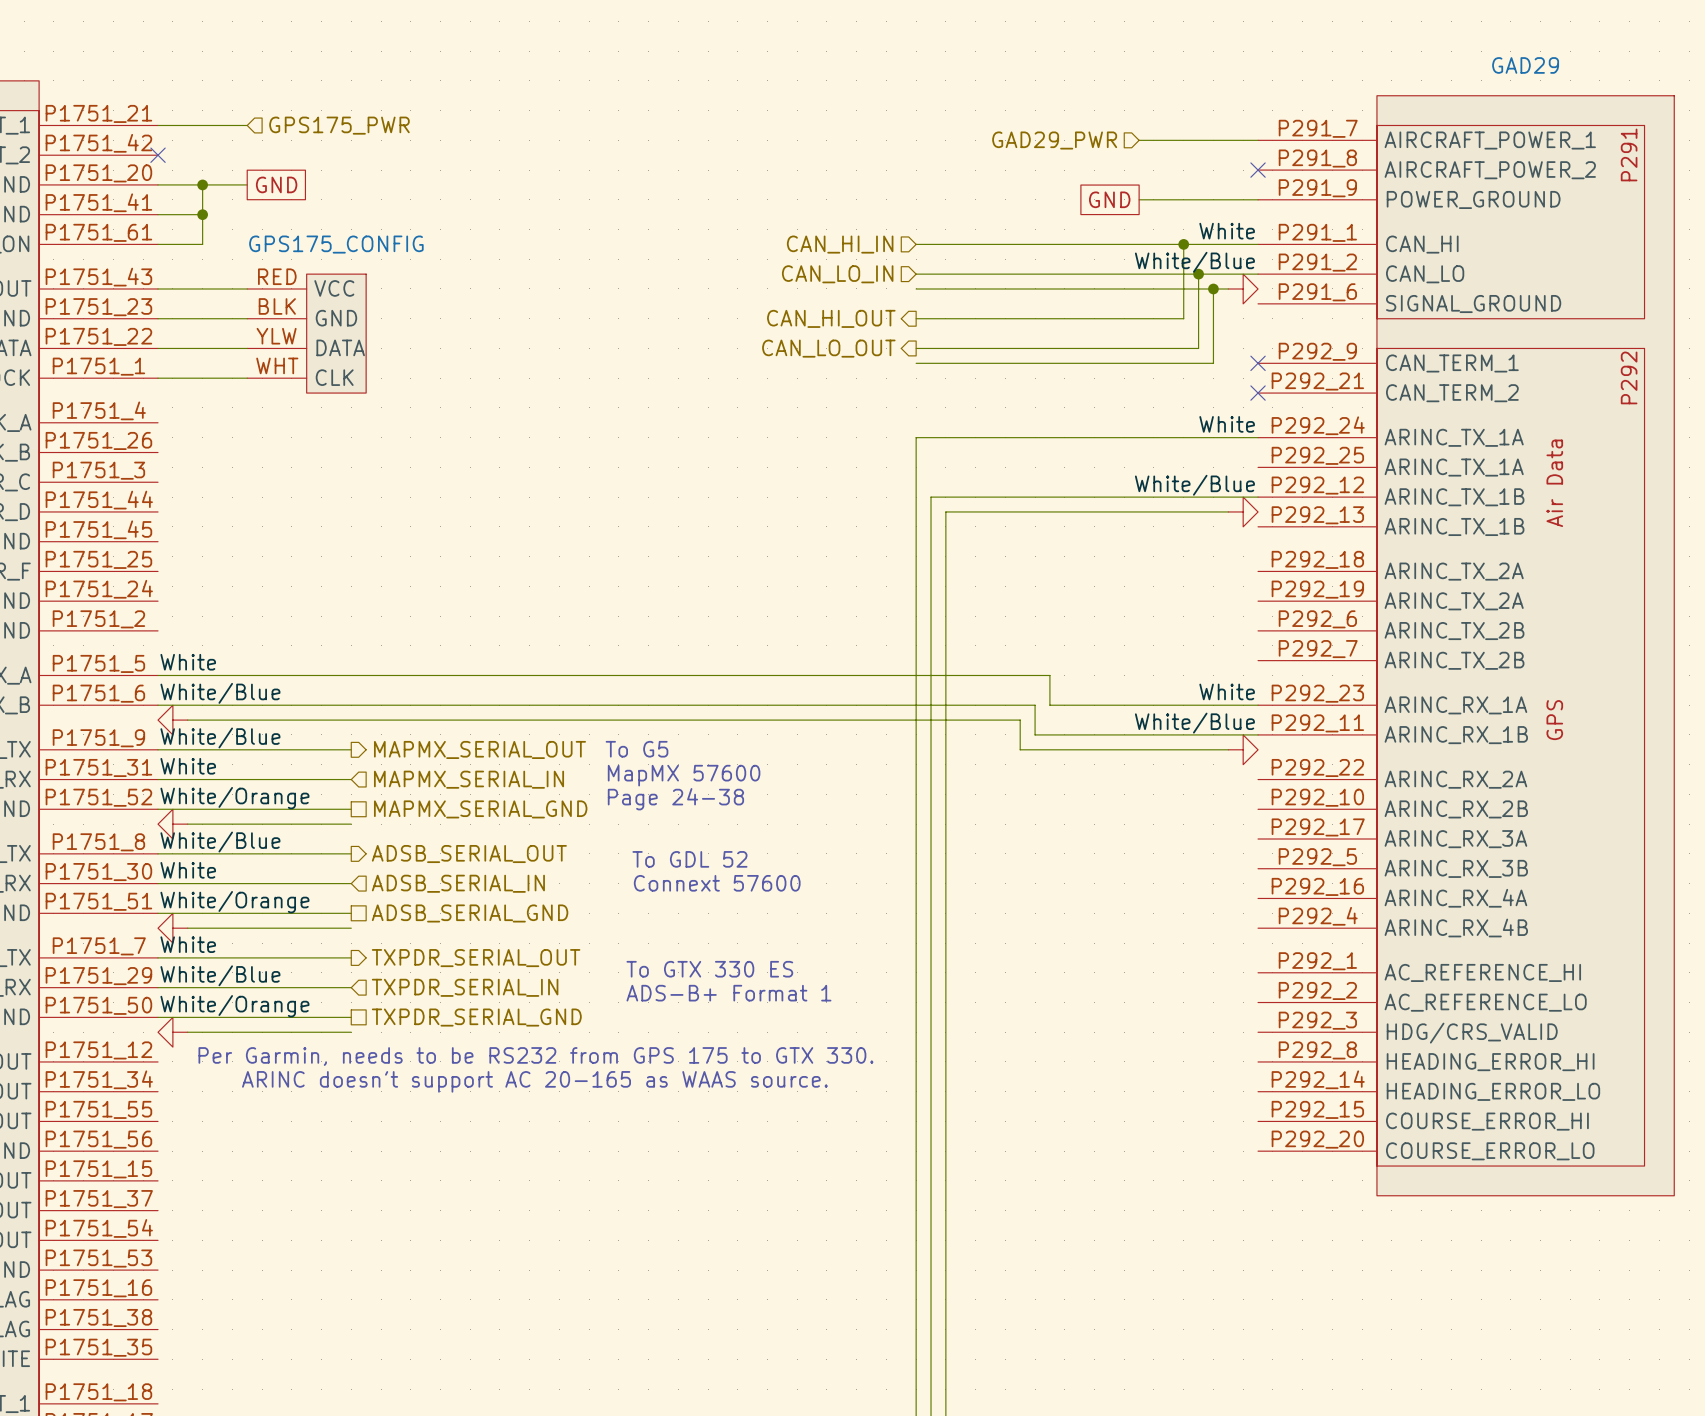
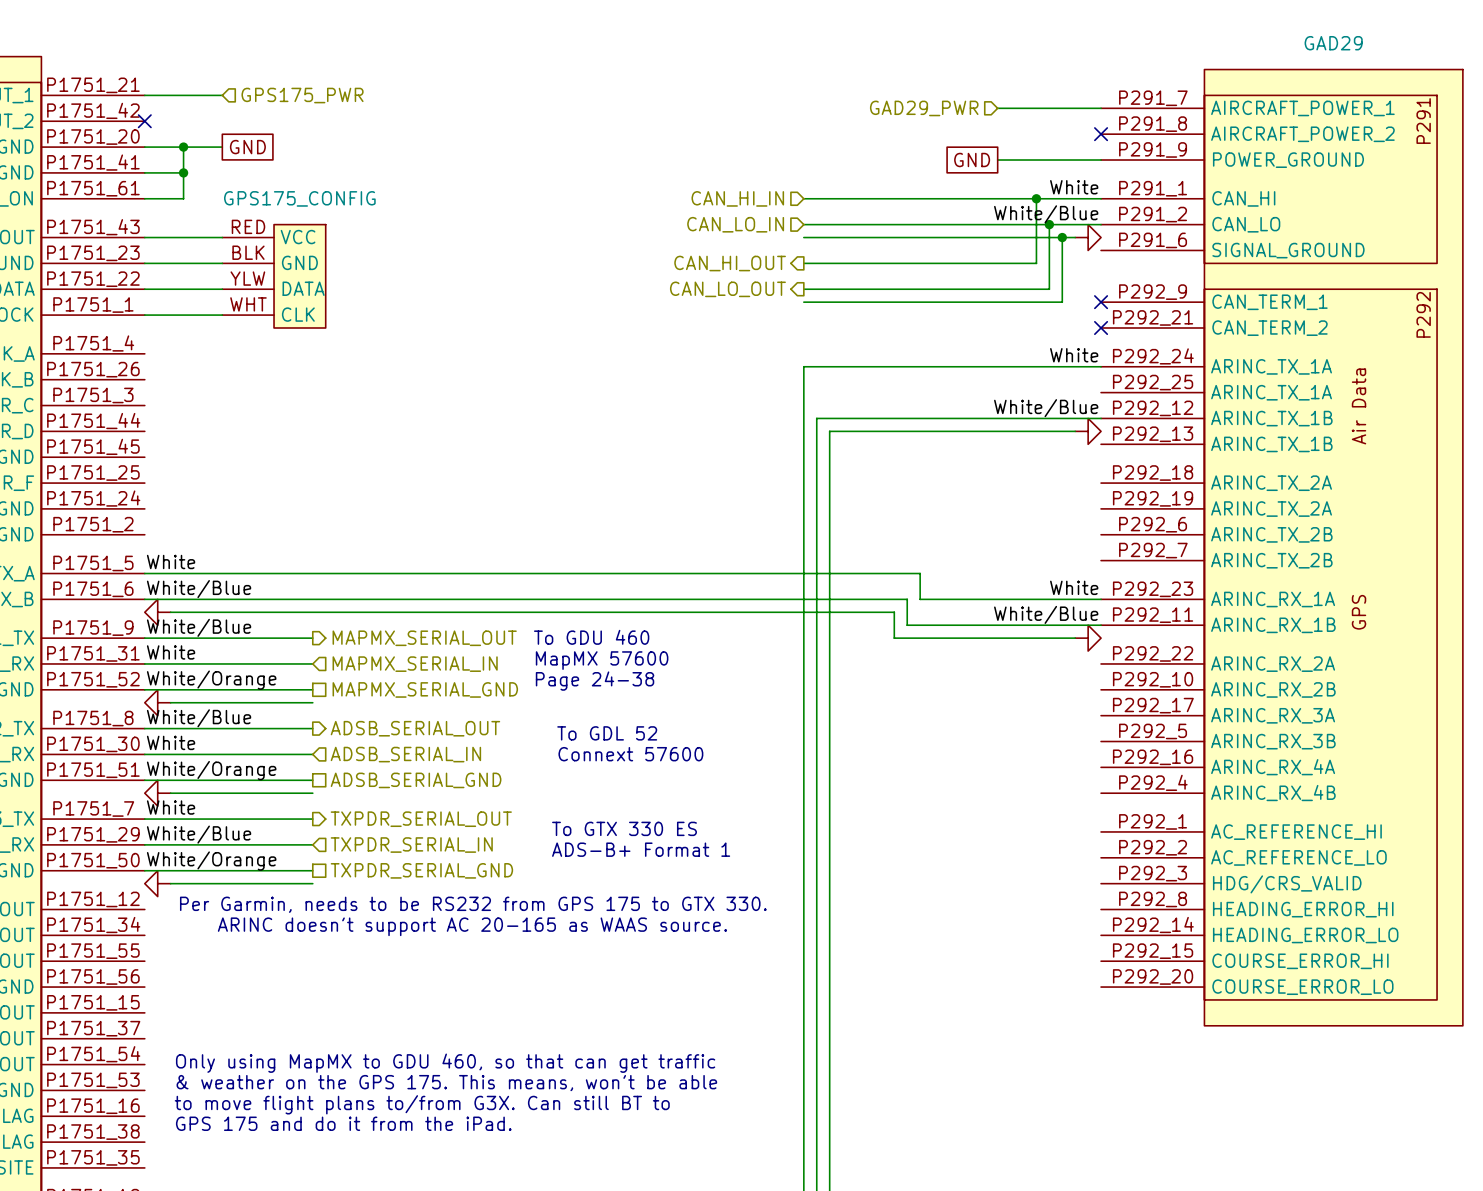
text: To G5 (637, 749) -> To GDU 460 (591, 637)
text: none -> Only using MapMX to GDU 460, so that can get traffic (445, 1063)
text: none -> & weather on the GPS 175. This means, won't be able (446, 1083)
text: none -> to move flight plans to/from G3X. Can still BT to (422, 1104)
text: none -> GPS 175 and do it from the iPad. (343, 1123)

